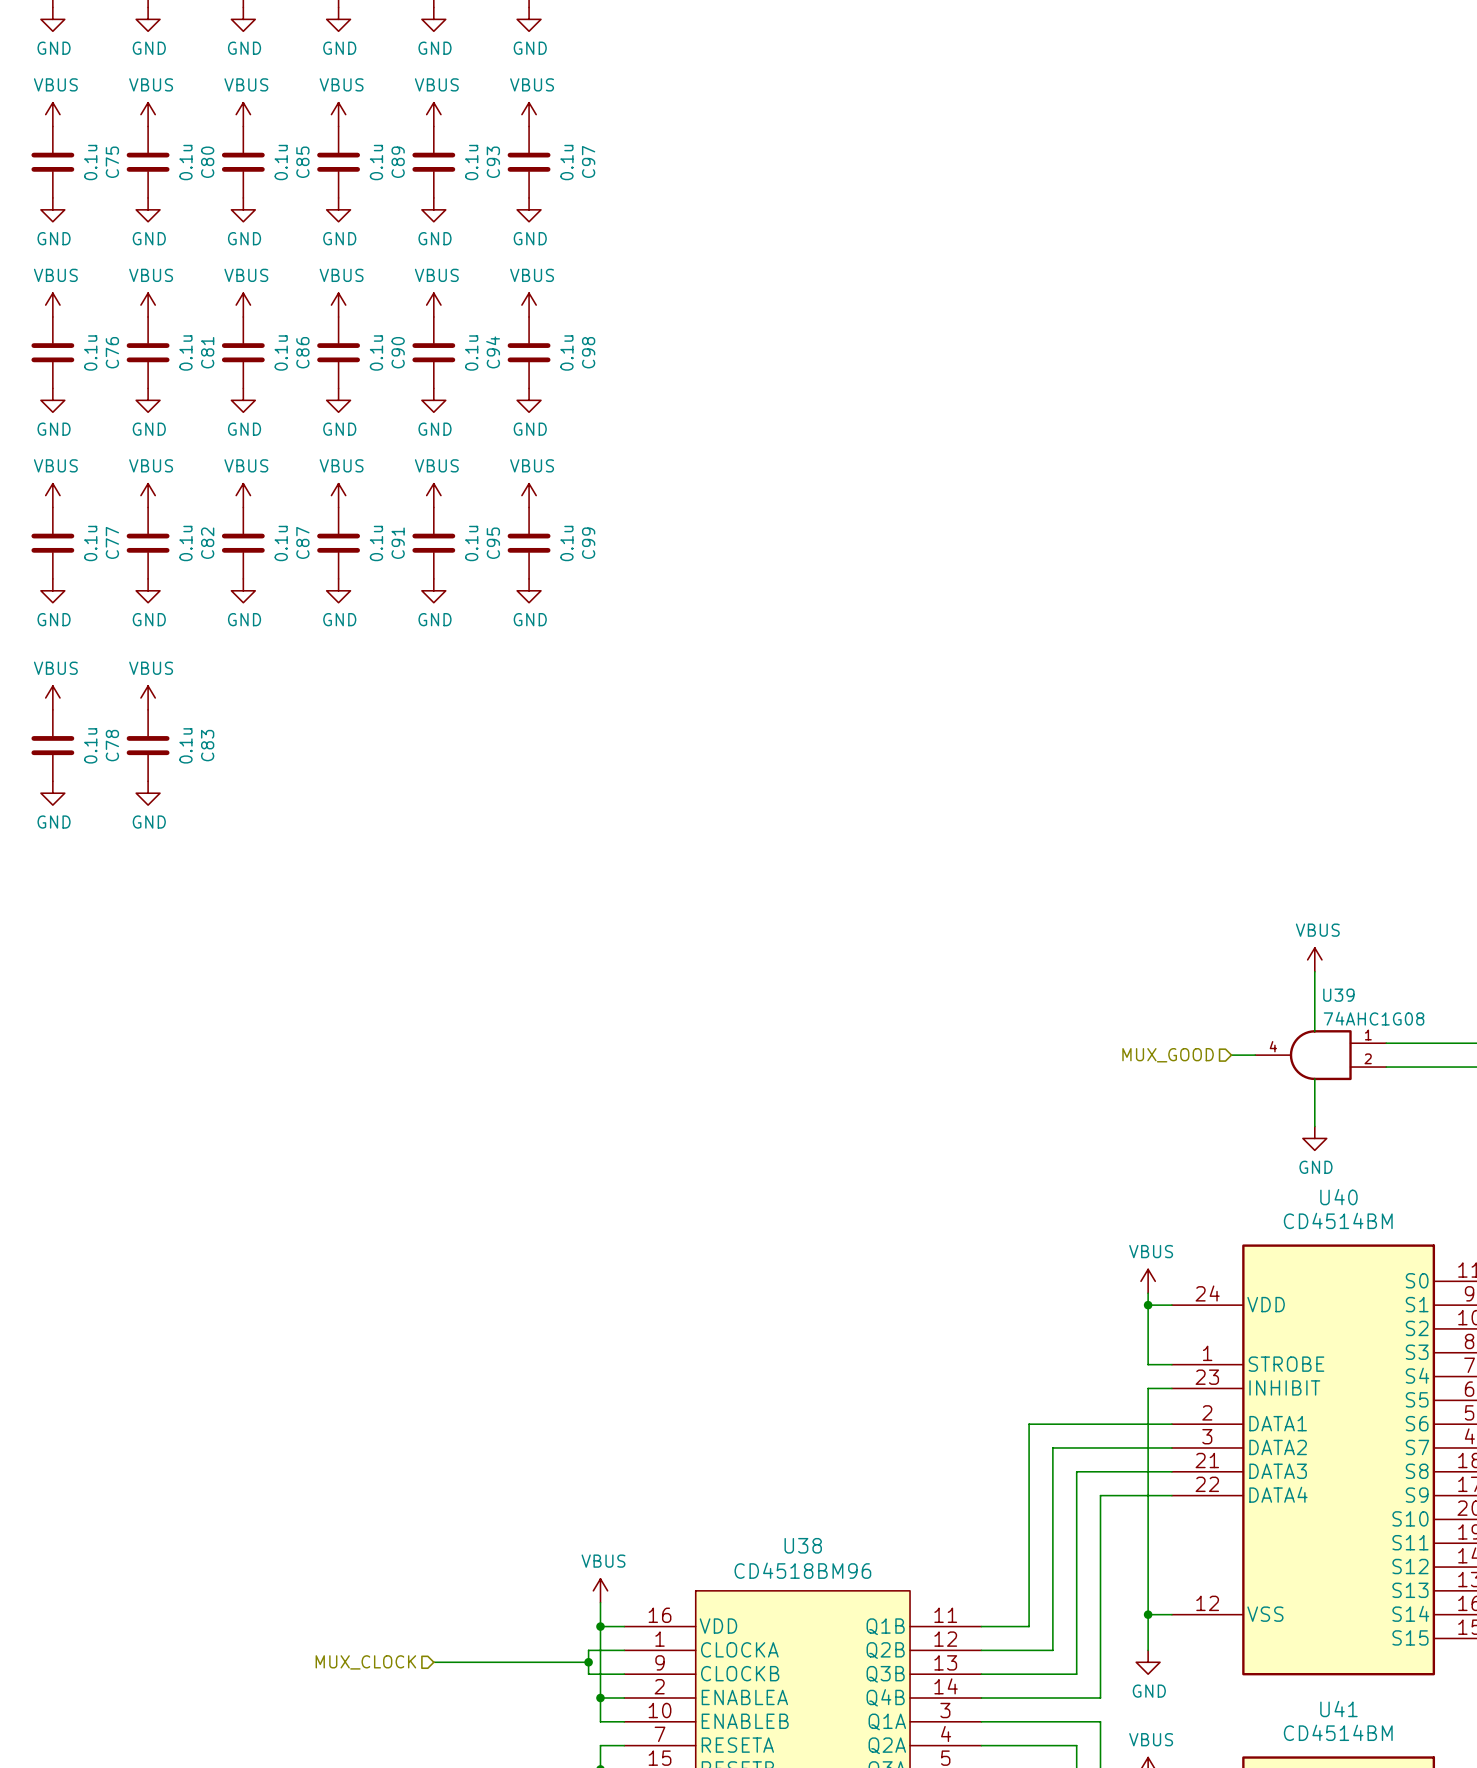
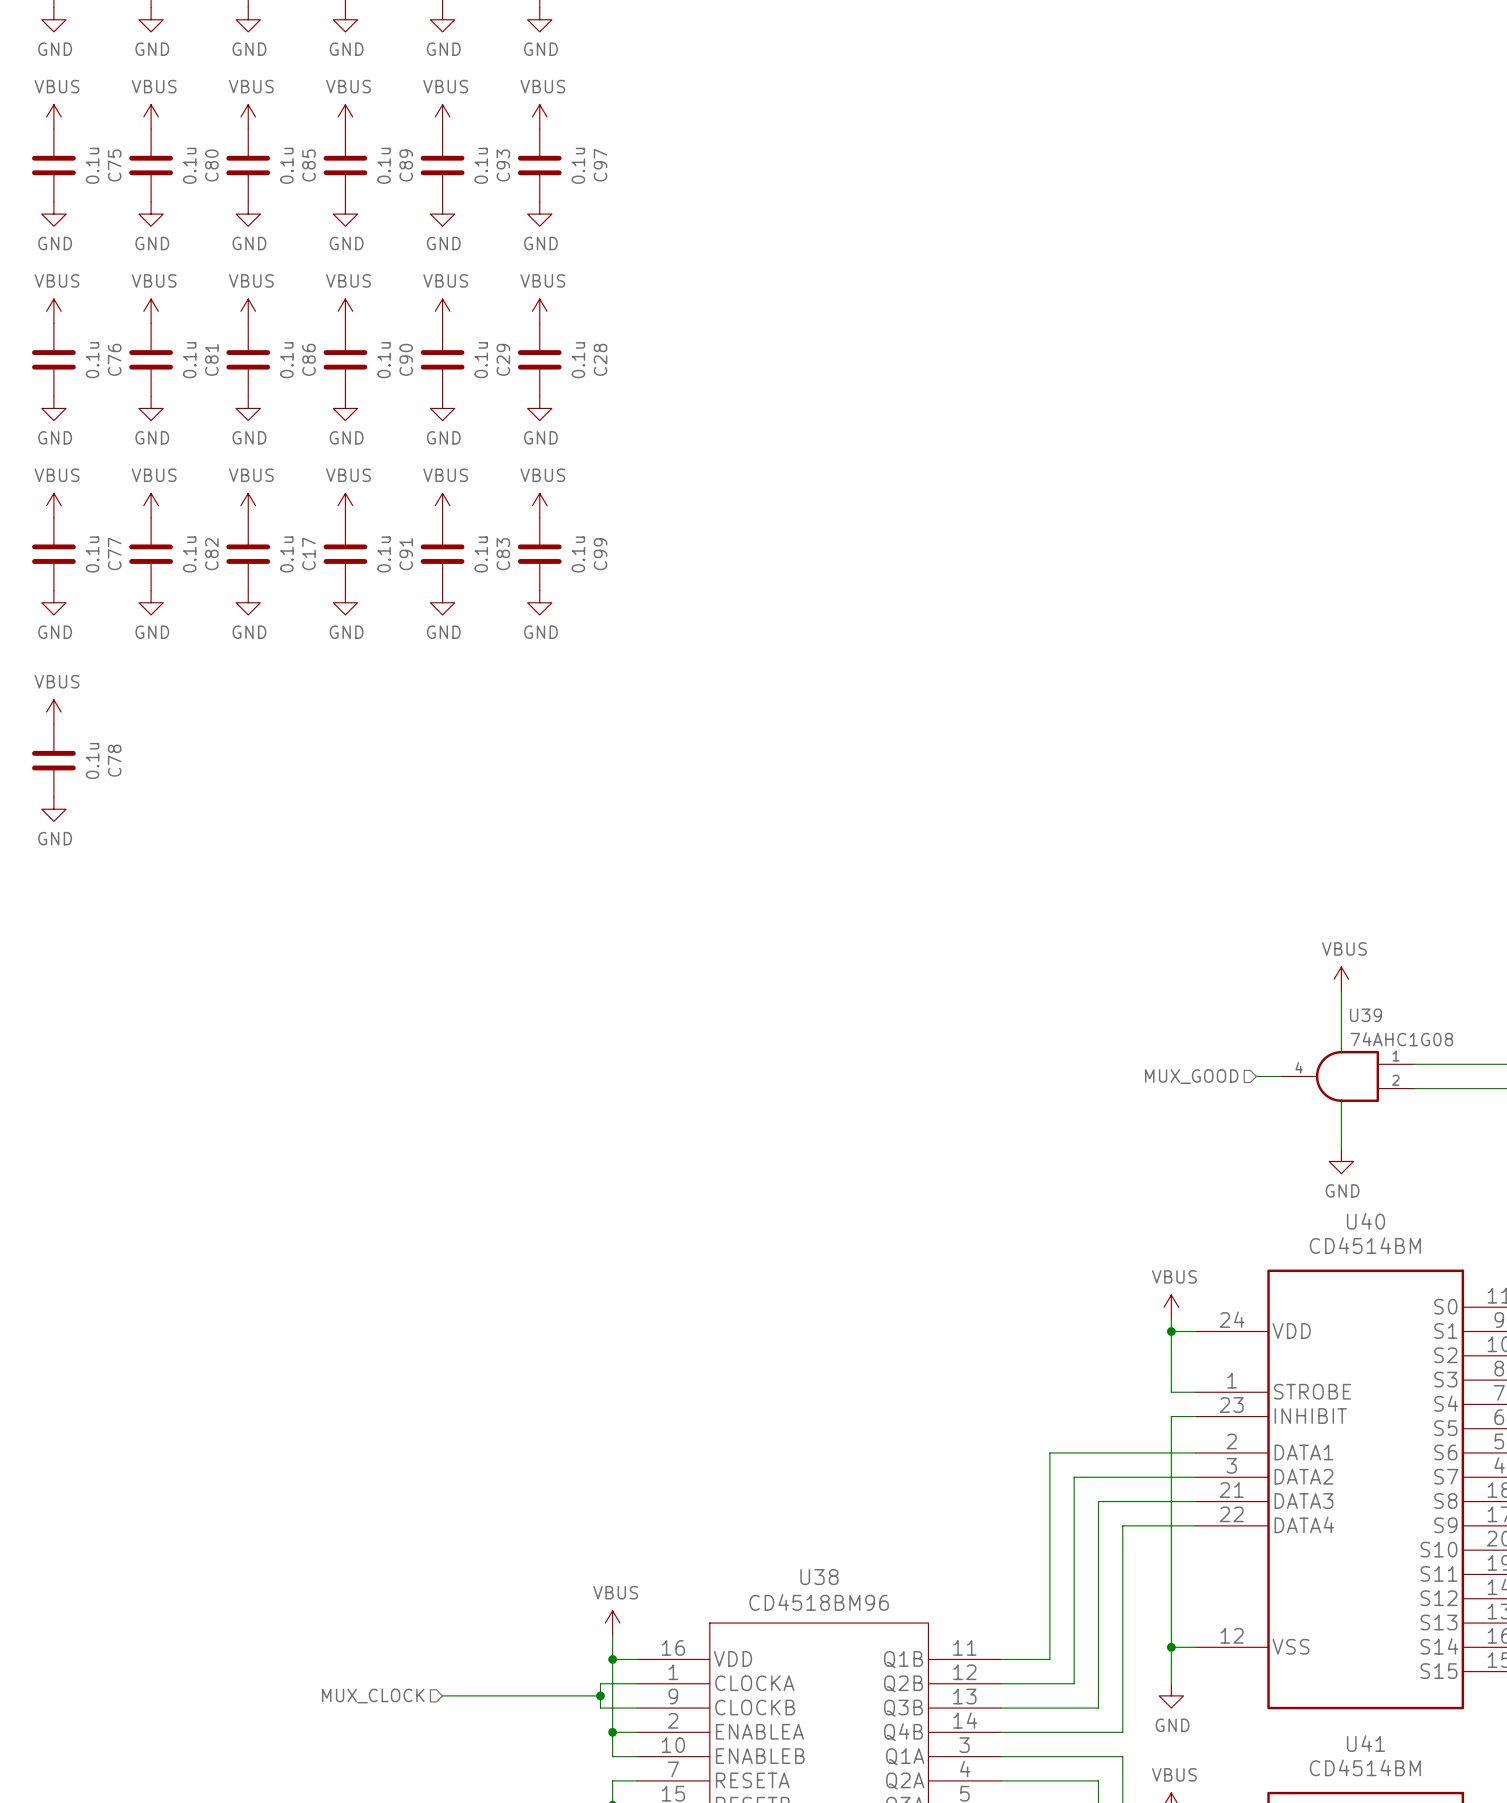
C94 name: C94 (493, 352) -> C29 (503, 359)
C98 name: C98 (588, 352) -> C28 (600, 359)
C87 name: C87 (302, 542) -> C17 (309, 553)
C95 name: C95 (493, 543) -> C83 (503, 554)
power symbol: VBUS (148, 697) -> none
C83: 0.1u (148, 745) -> none
power symbol: GND (148, 793) -> none

